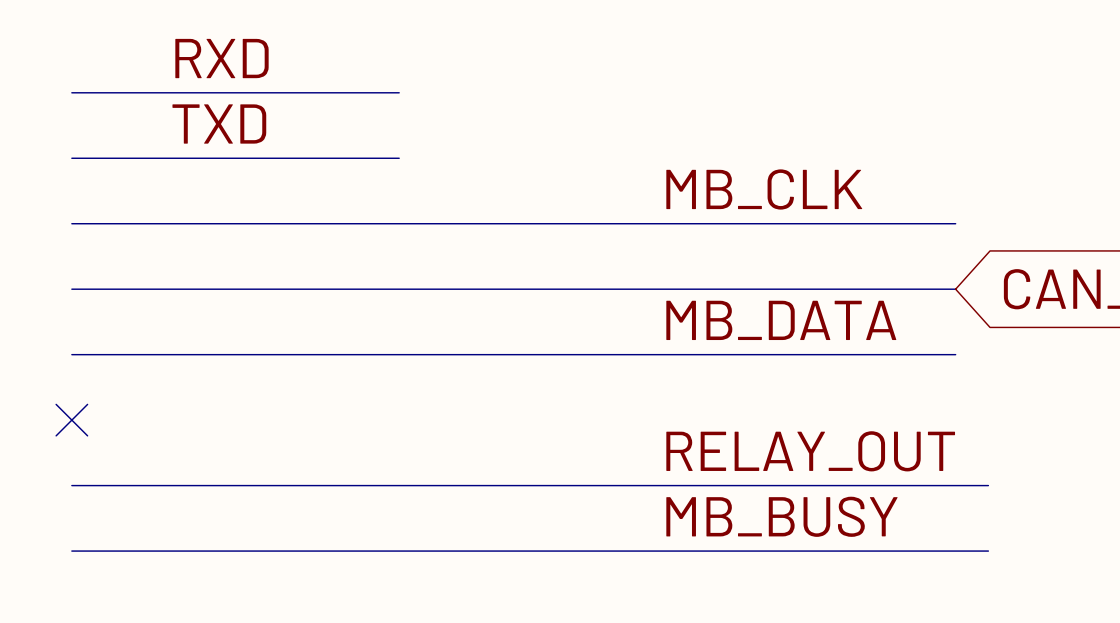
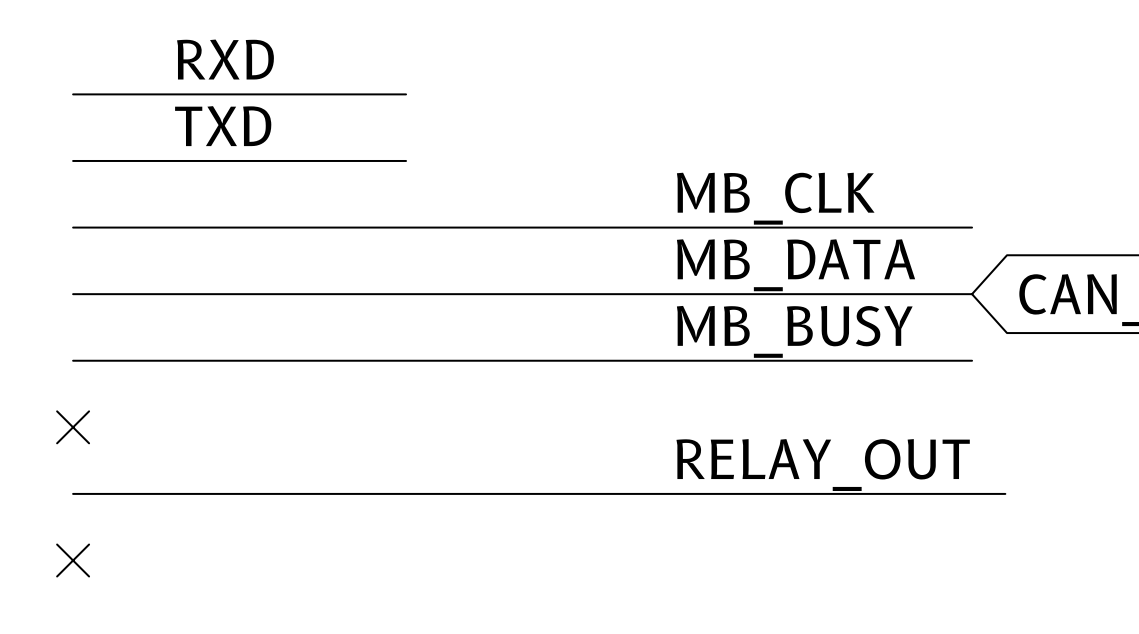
label: none -> MB_DATA (796, 265)
label: MB_DATA (781, 320) -> MB_BUSY (794, 331)
label: MB_BUSY (781, 516) -> none
wire: (71, 551) (988, 551) -> none
no-connect mark: none -> (73, 560)

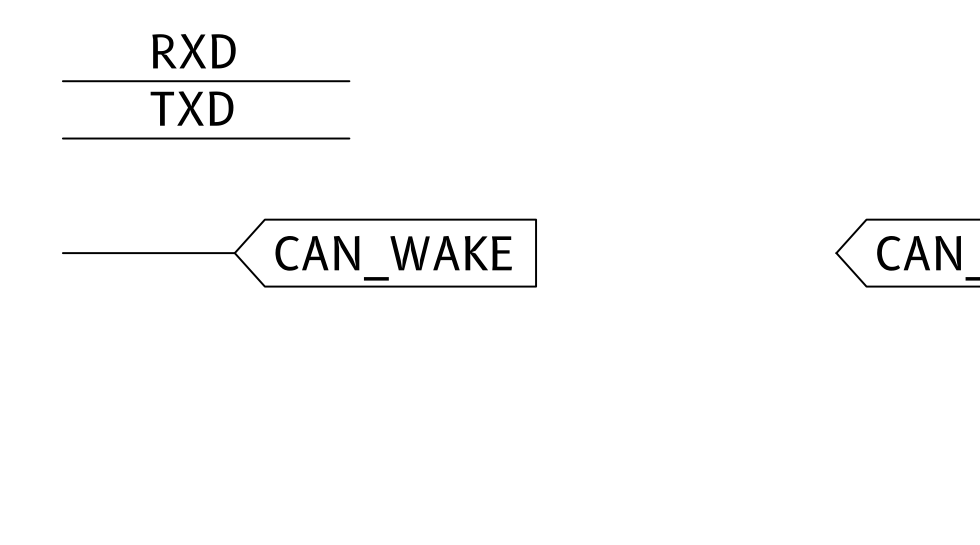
label: MB_CLK (775, 198) -> none
wire: (73, 227) (972, 227) -> none
label: MB_DATA (796, 265) -> none
wire: (272, 294) (972, 294) -> none
global label: none -> CAN_WAKE (393, 258)
label: MB_BUSY (794, 331) -> none
wire: (73, 360) (972, 360) -> none
no-connect mark: (73, 427) -> none
label: RELAY_OUT (823, 465) -> none
wire: (73, 493) (1005, 493) -> none
no-connect mark: (73, 560) -> none

